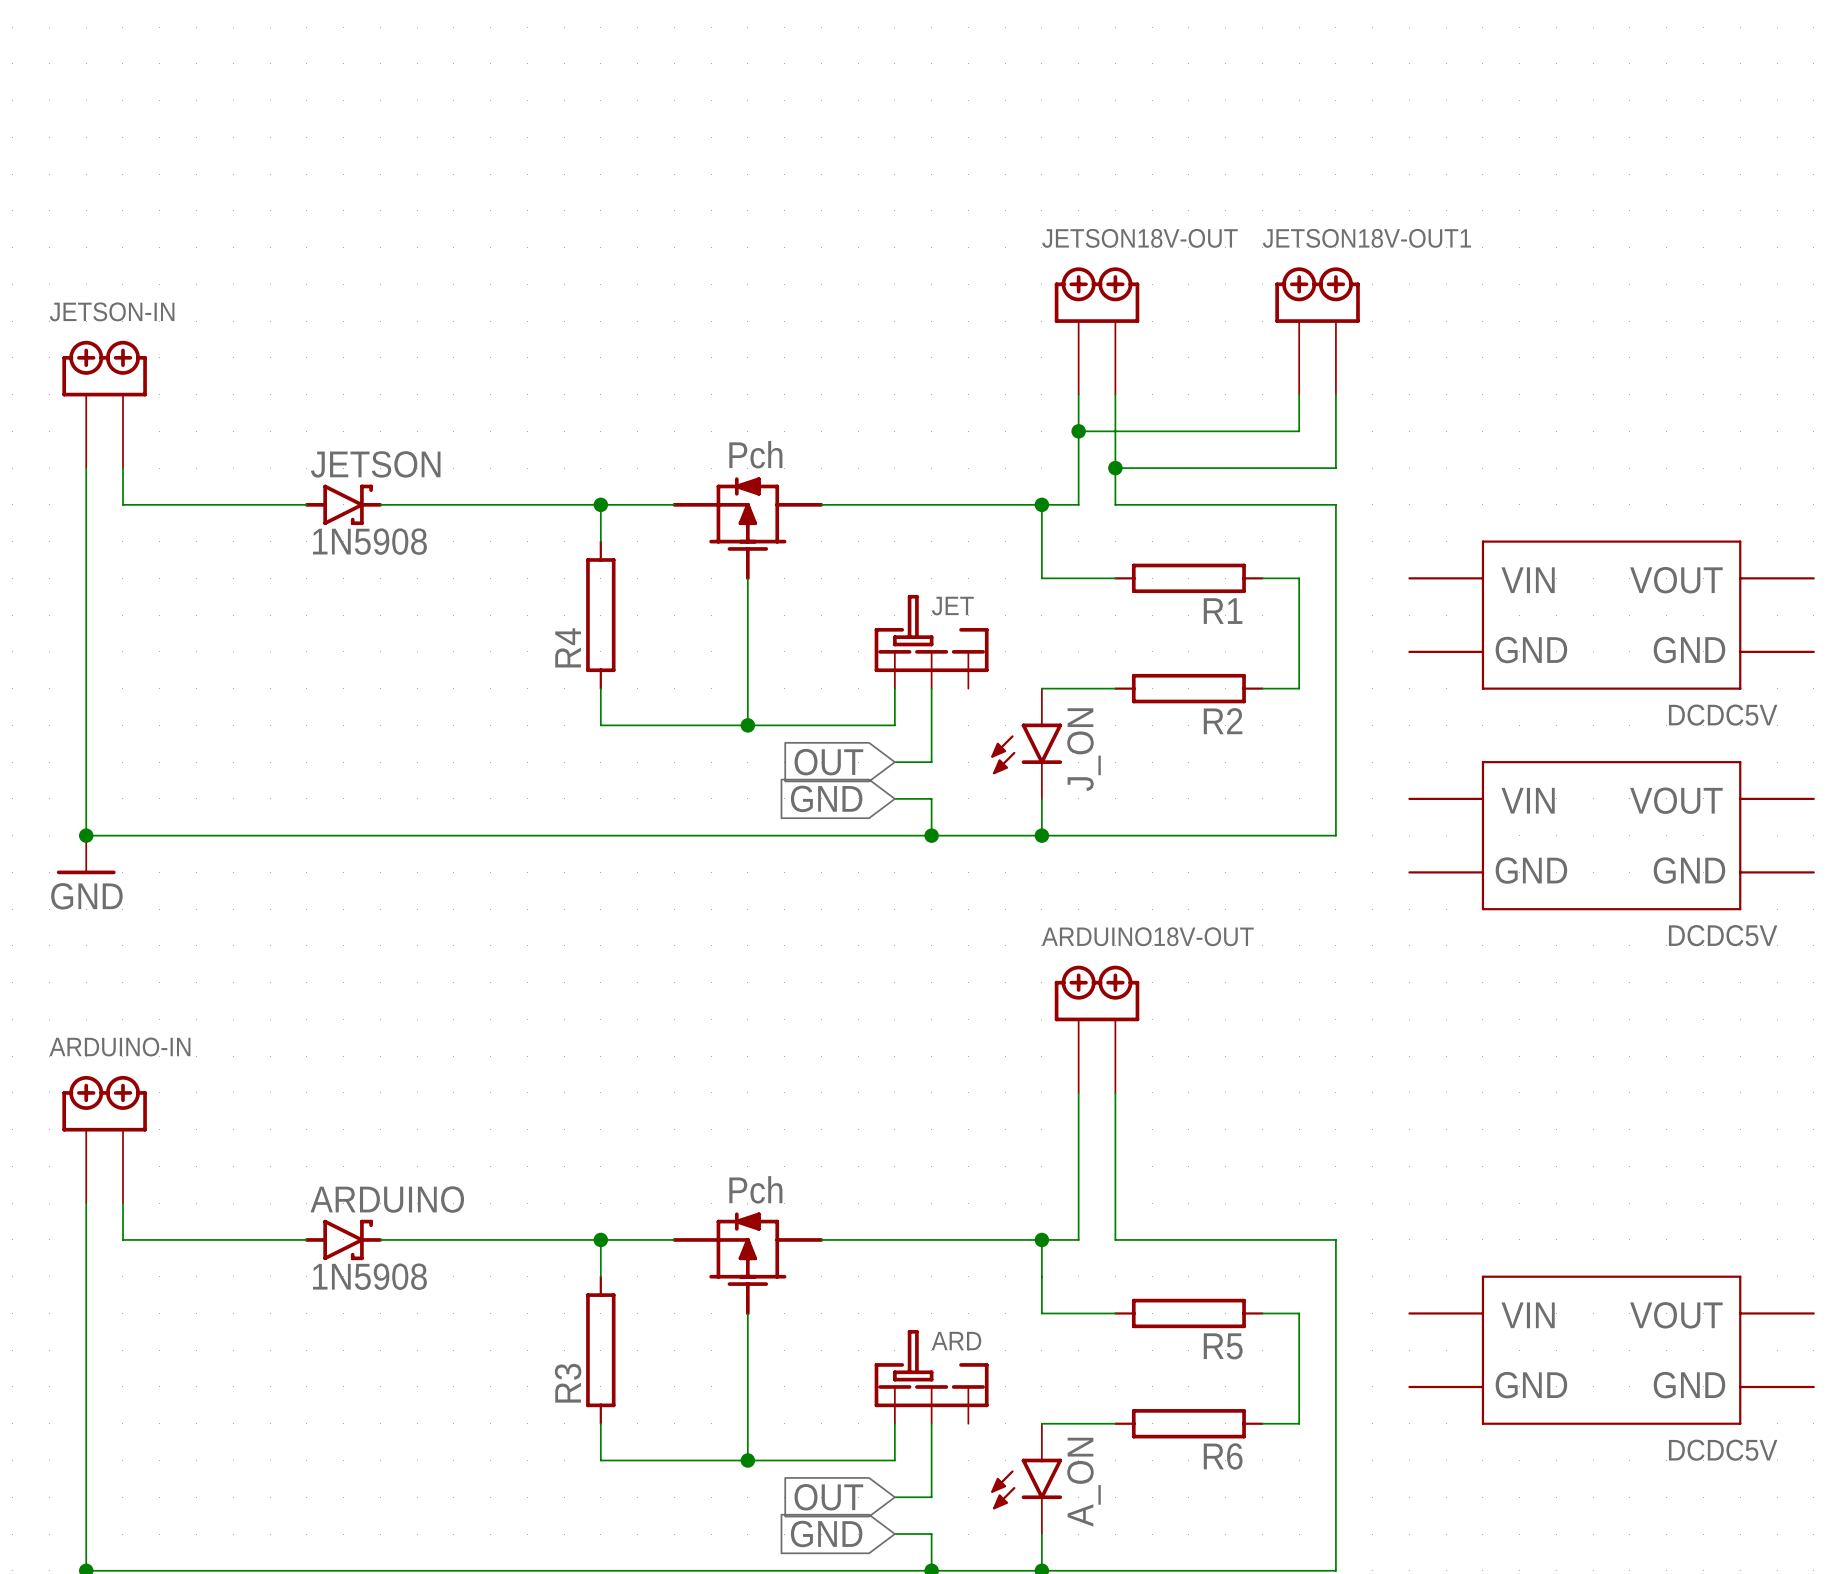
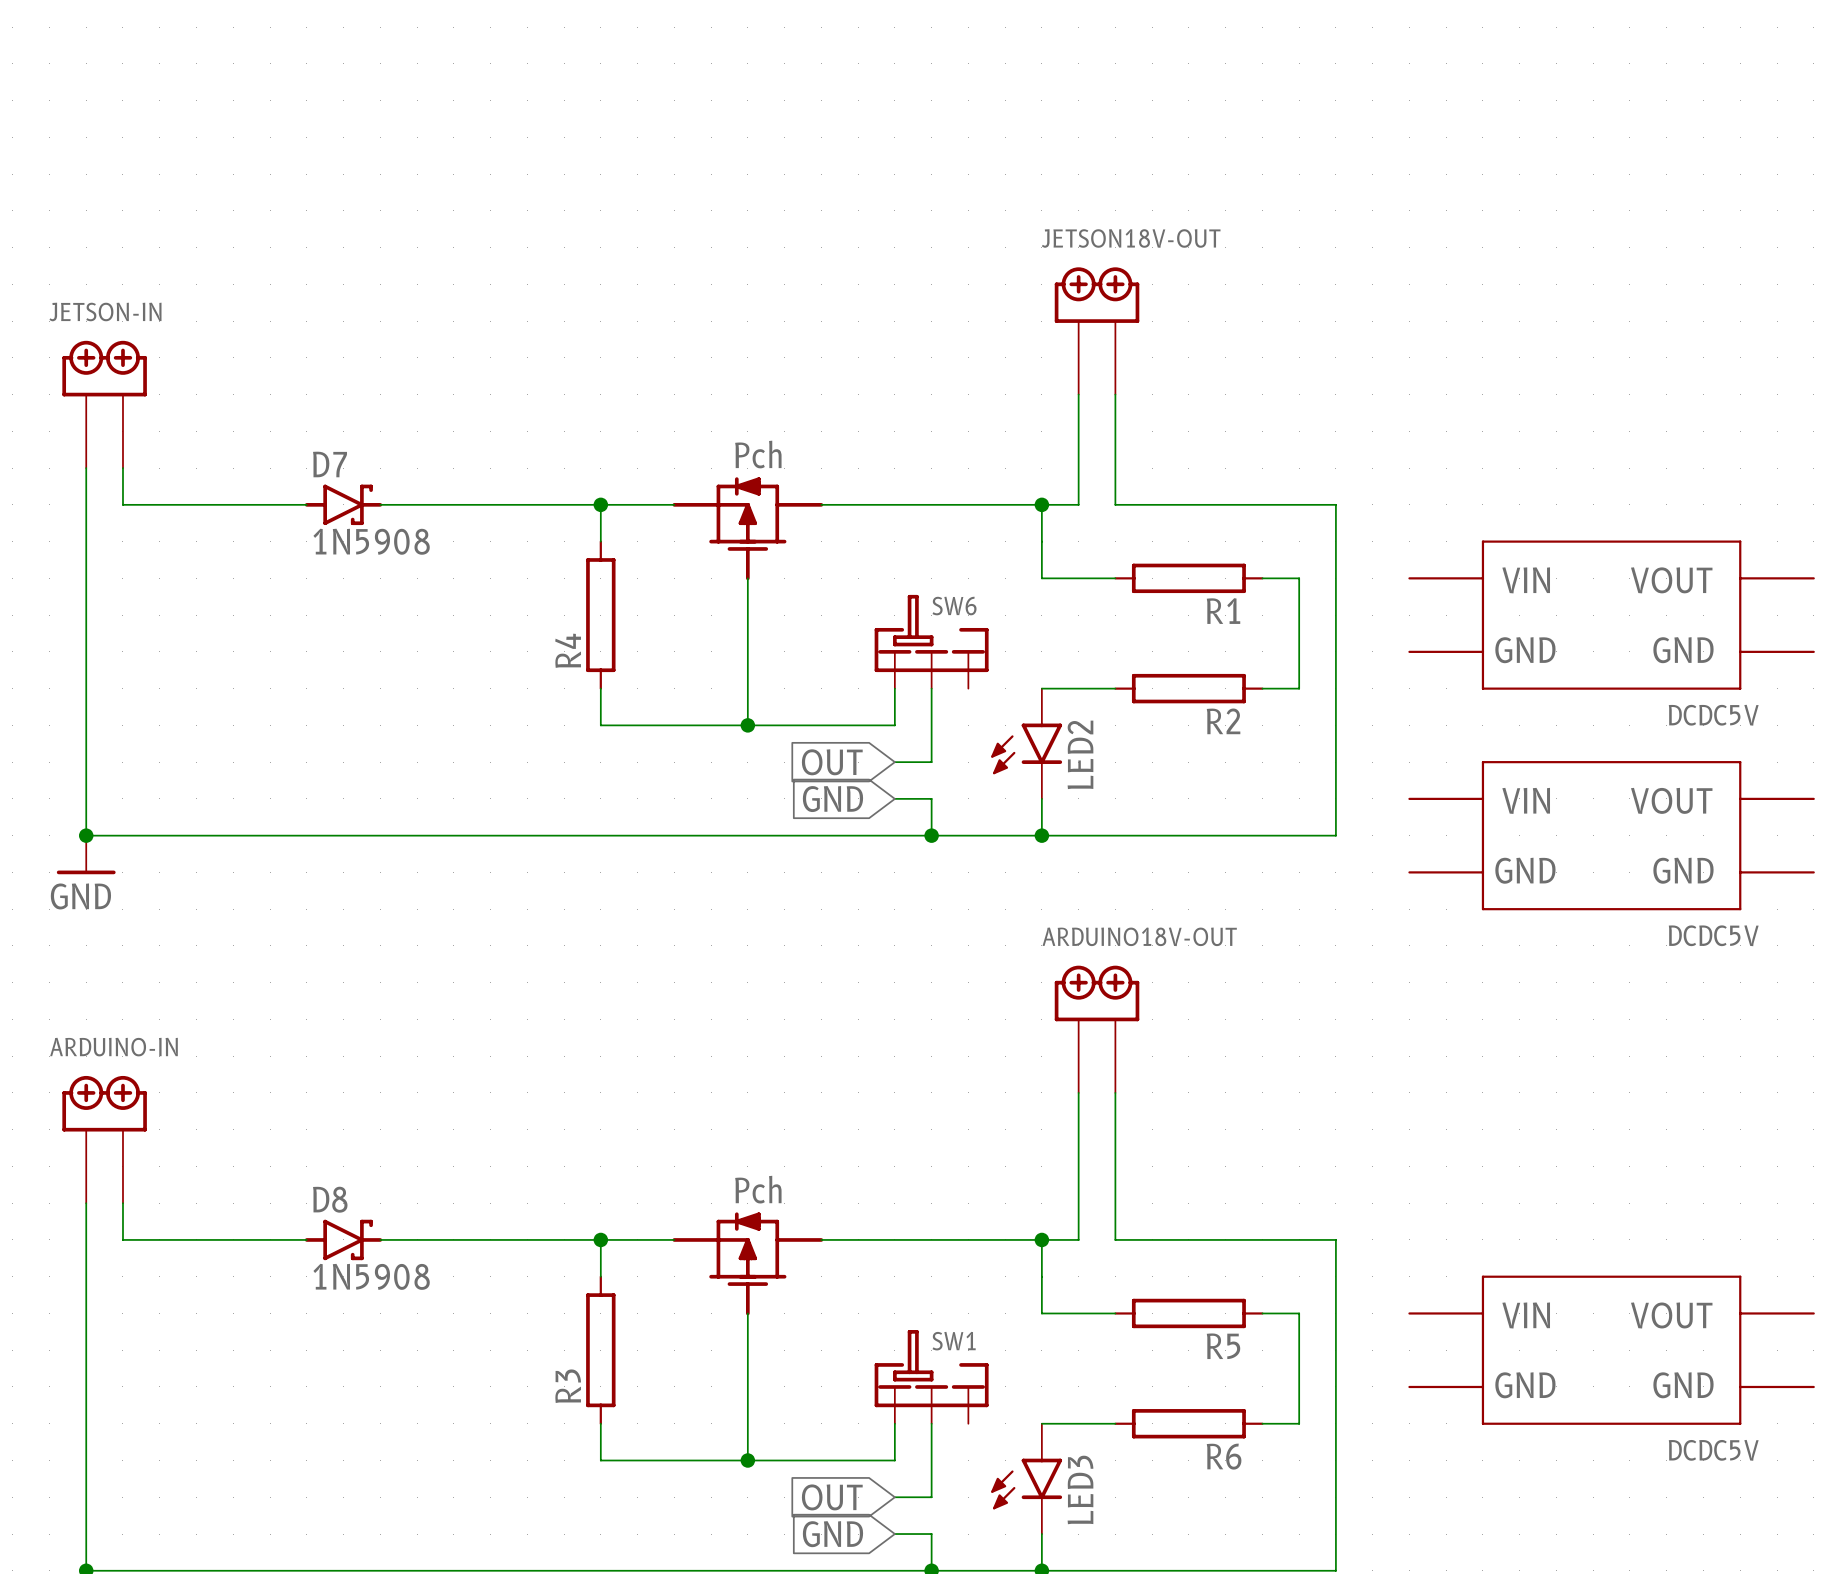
JETSON18V-OUT1: (1317, 330) -> none
wire: (1299, 394) (1299, 431) (1078, 431) -> none
wire: (1335, 394) (1335, 468) (1115, 468) -> none
junction: (1078, 431) -> none
JETSON name: JETSON (375, 464) -> D7 (330, 464)
junction: (1115, 468) -> none
JET name: JET (952, 606) -> SW6 (954, 606)
J_ON name: J_ON (1084, 749) -> LED2 (1080, 754)
ARDUINO name: ARDUINO (387, 1199) -> D8 (330, 1199)
ARD name: ARD (956, 1341) -> SW1 (954, 1341)
A_ON name: A_ON (1084, 1482) -> LED3 (1080, 1489)

